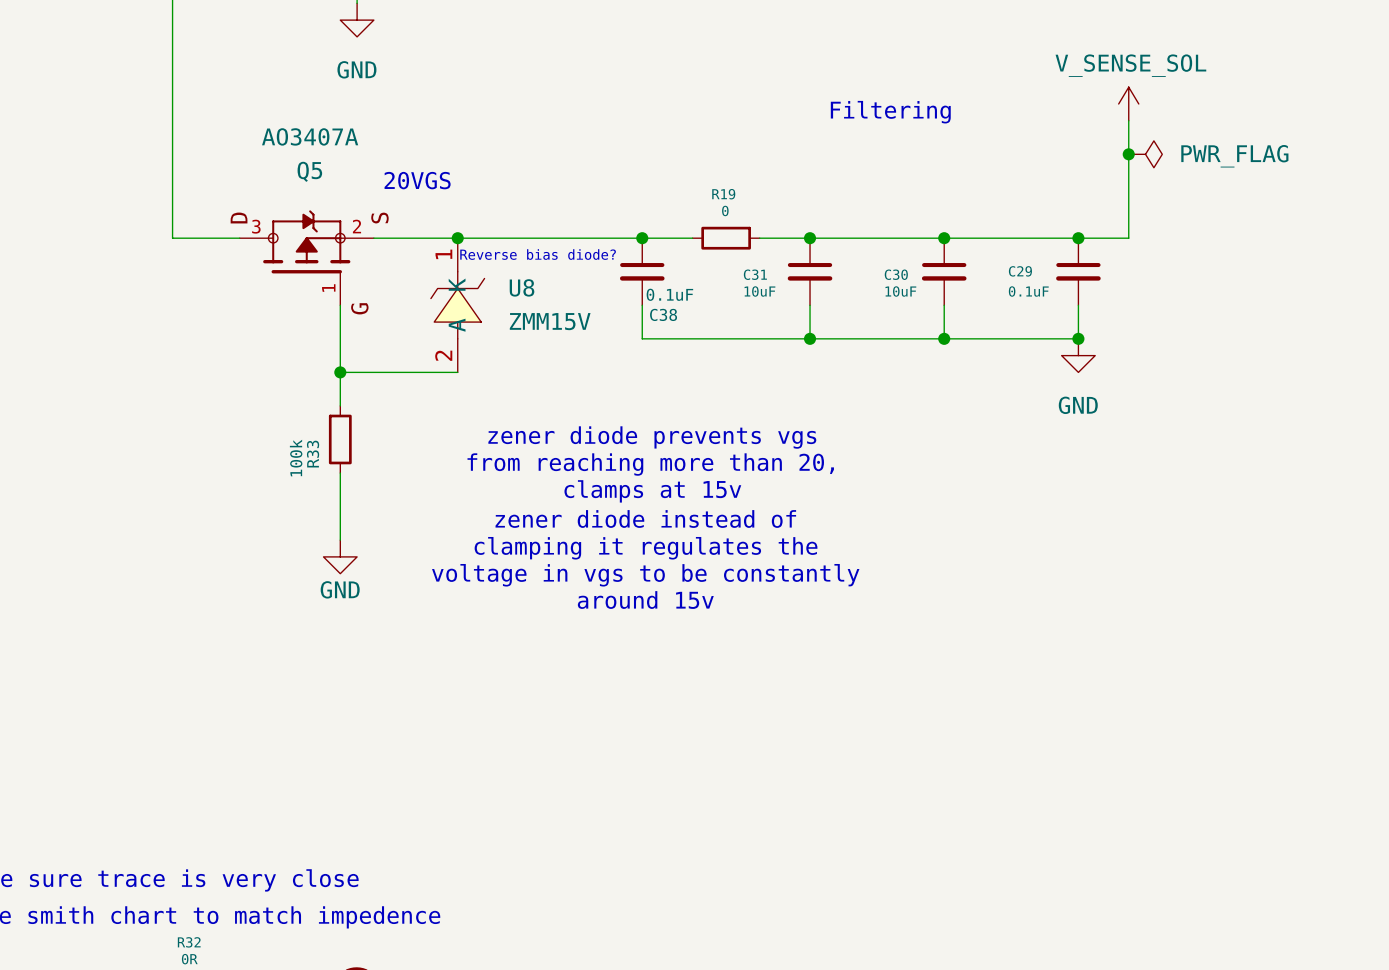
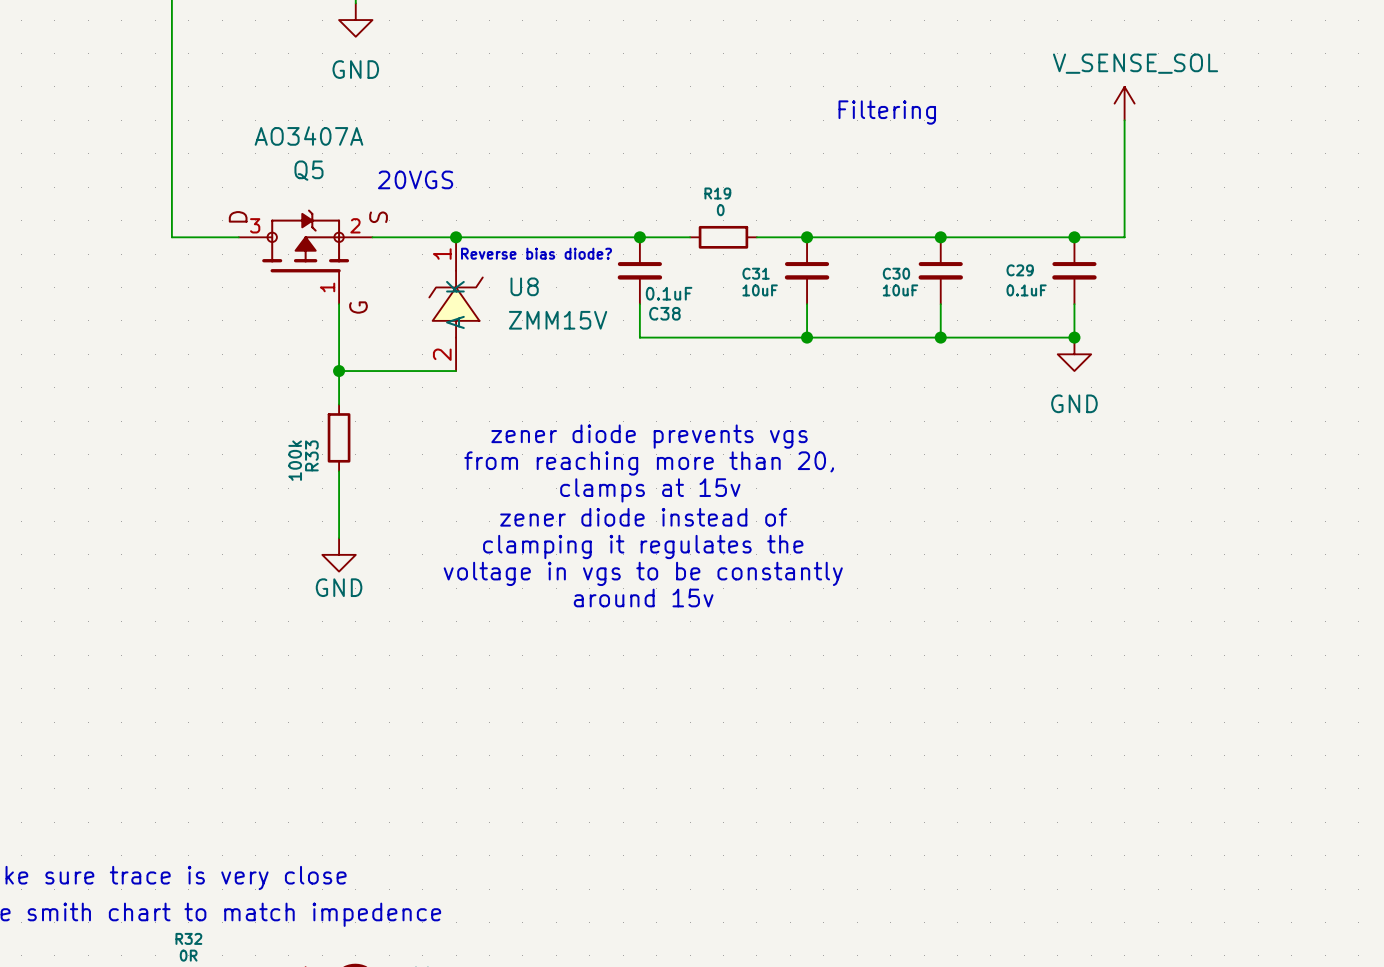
junction: (1128, 154) -> none
power symbol: PWR_FLAG (1145, 154) -> none

